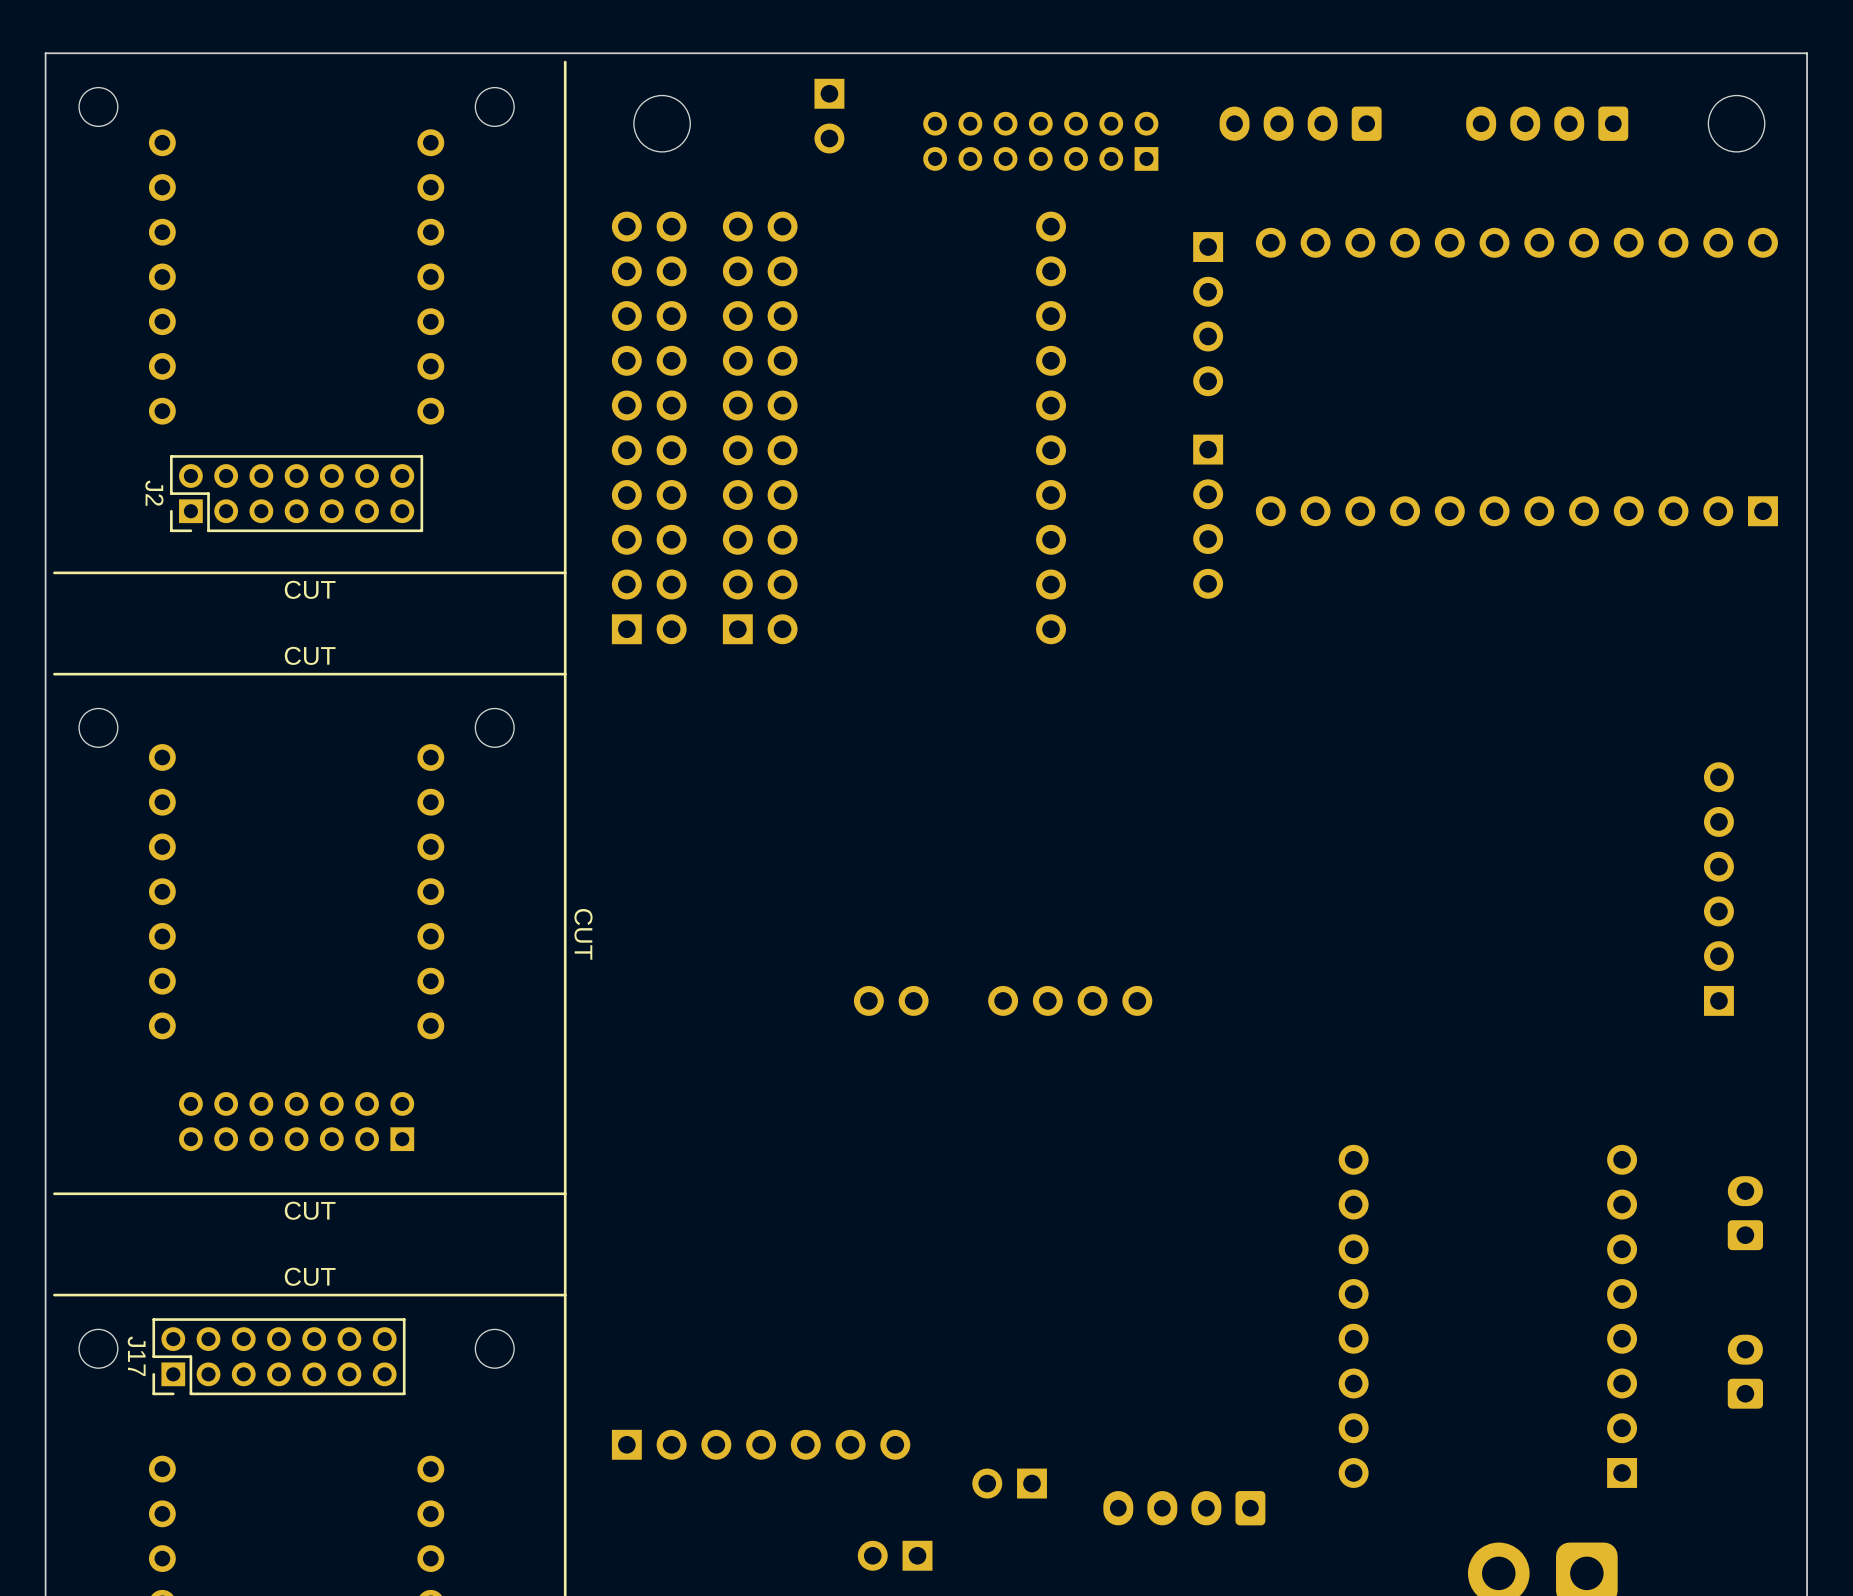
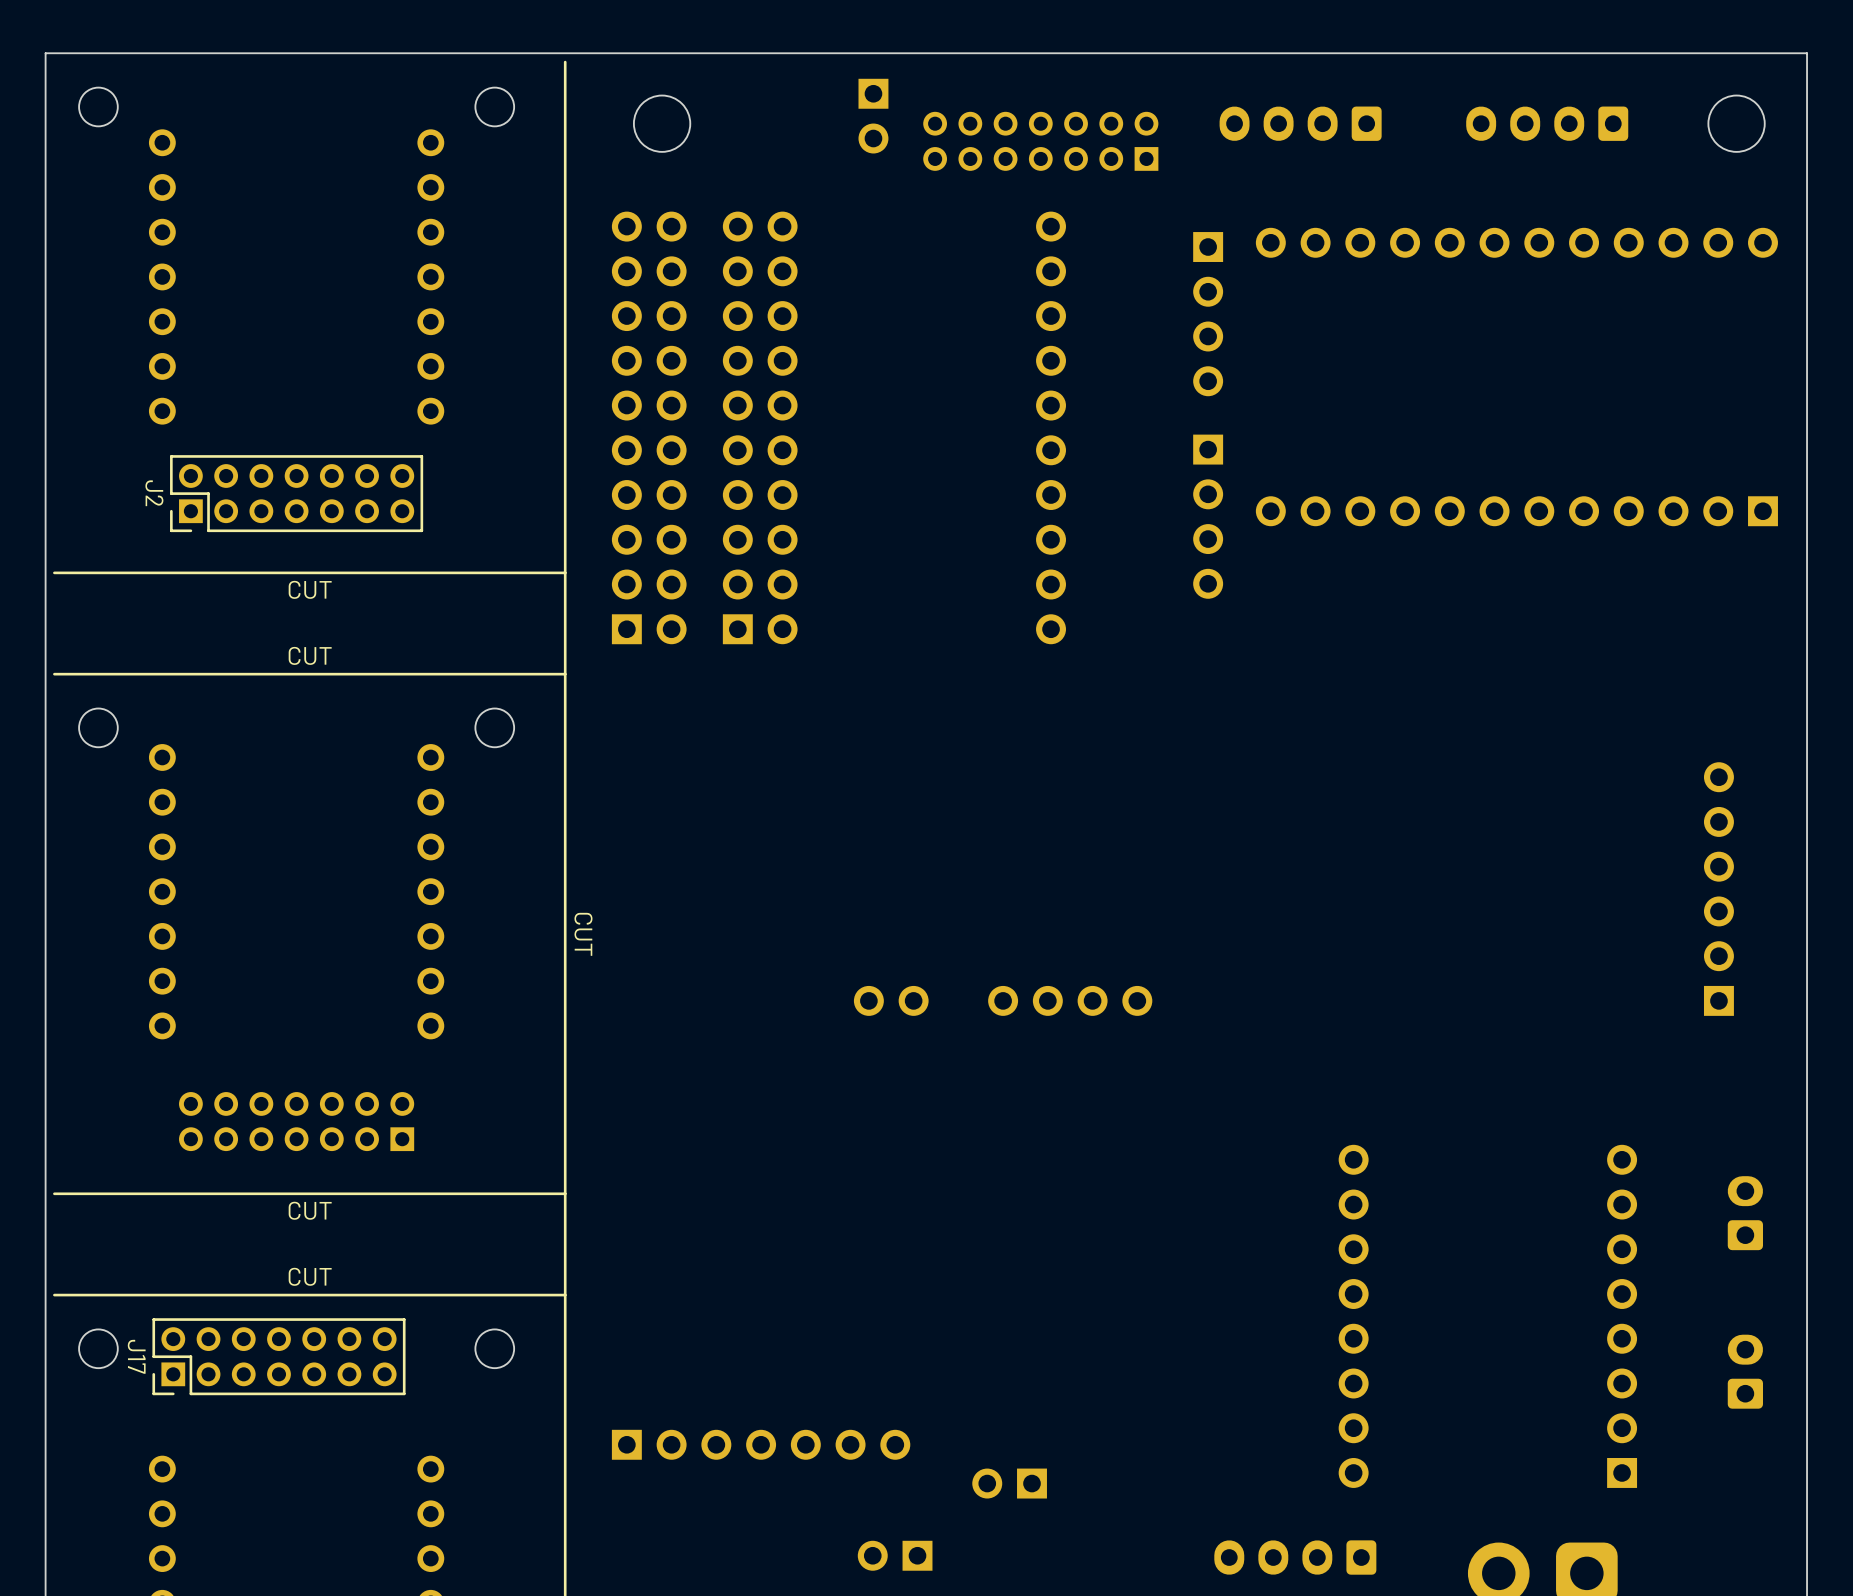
part position: (829, 116) -> (873, 116)
part position: (1184, 1508) -> (1295, 1557)

